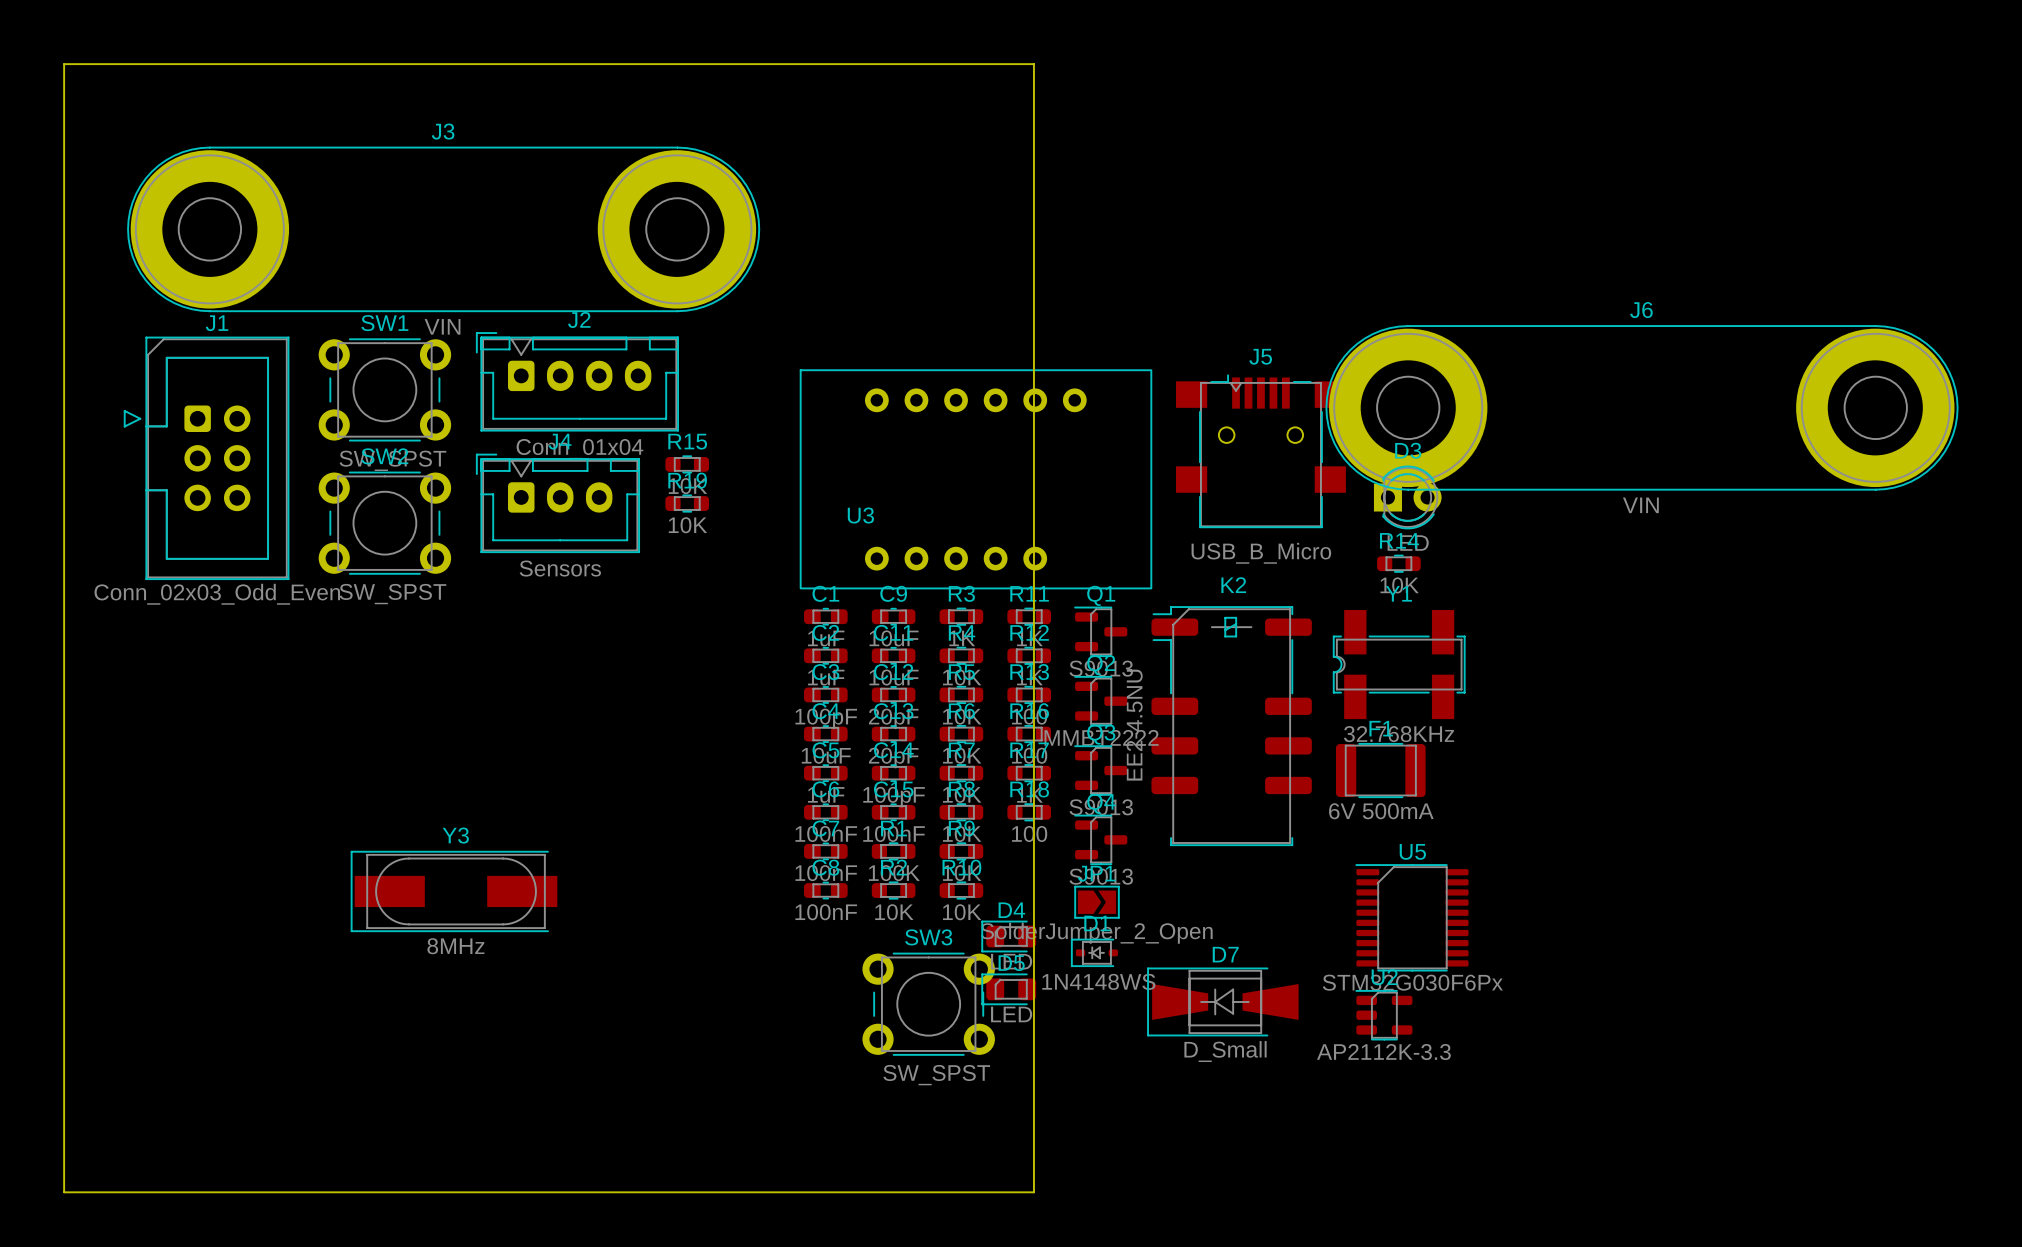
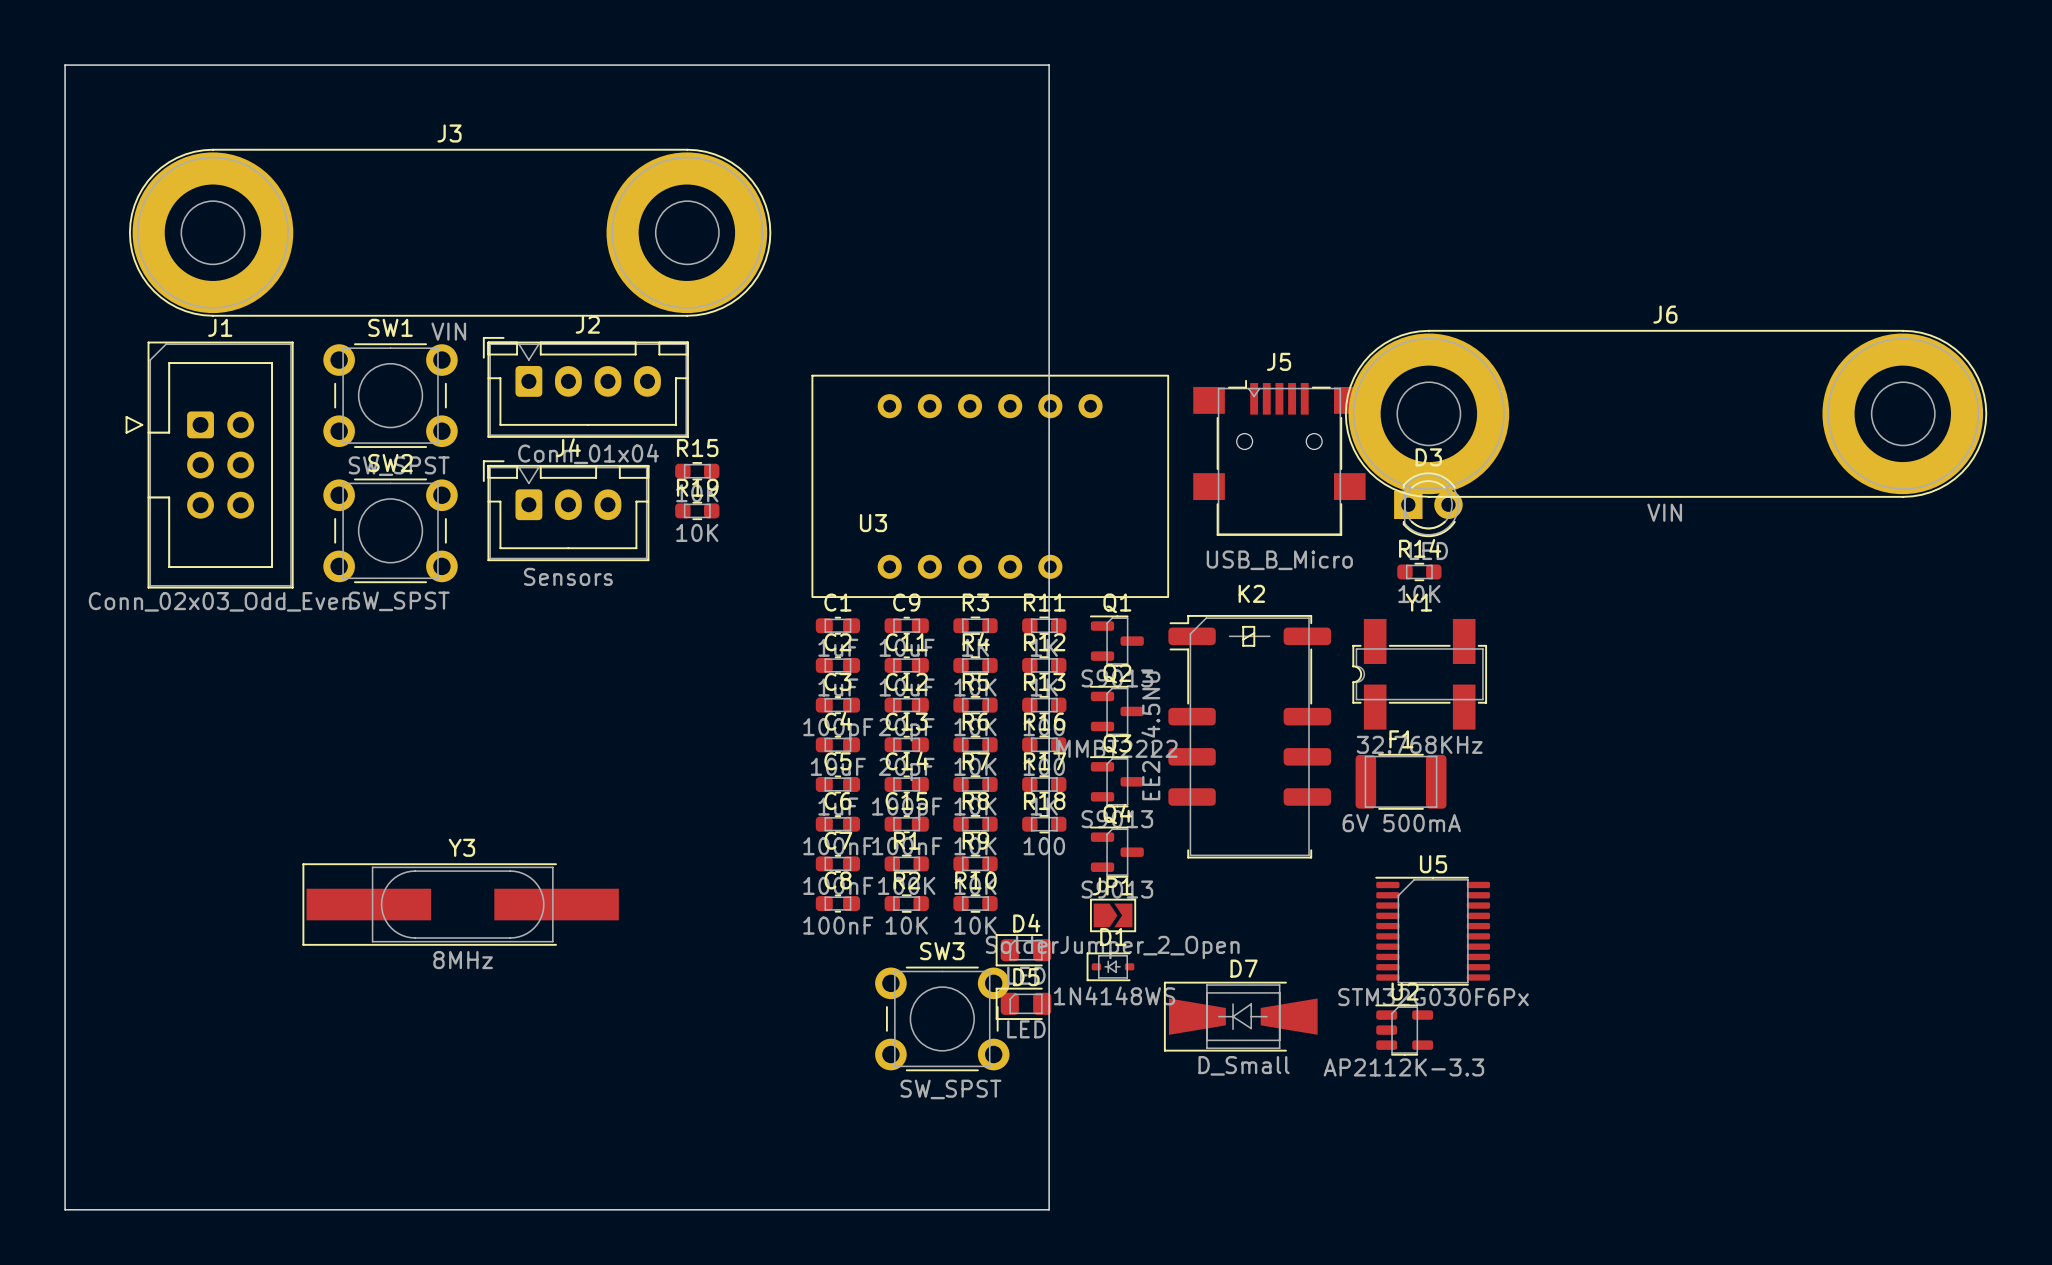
Y3 footprint: [350, 850, 558, 933] -> [302, 863, 619, 946]

